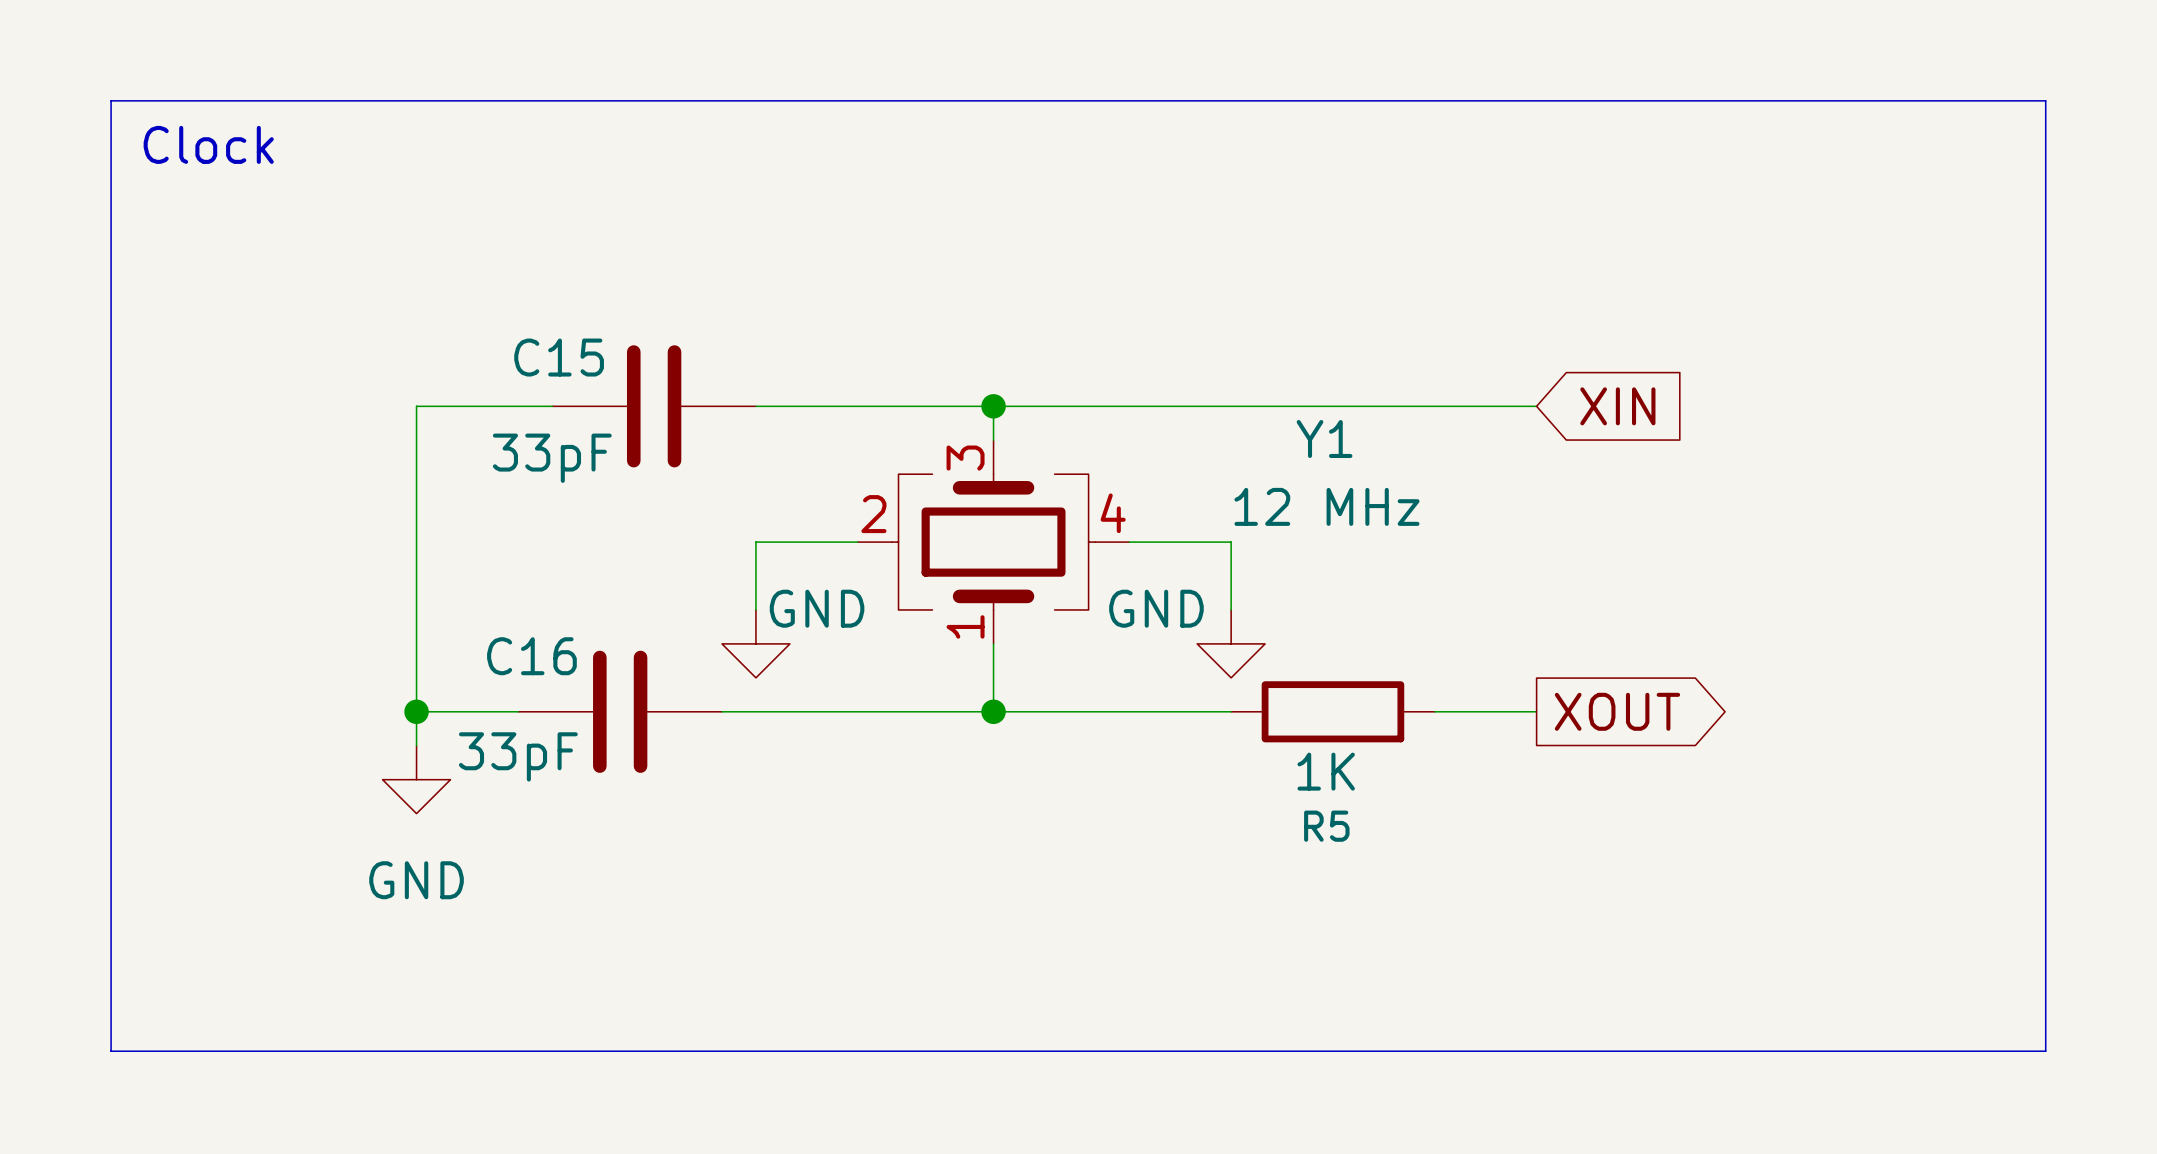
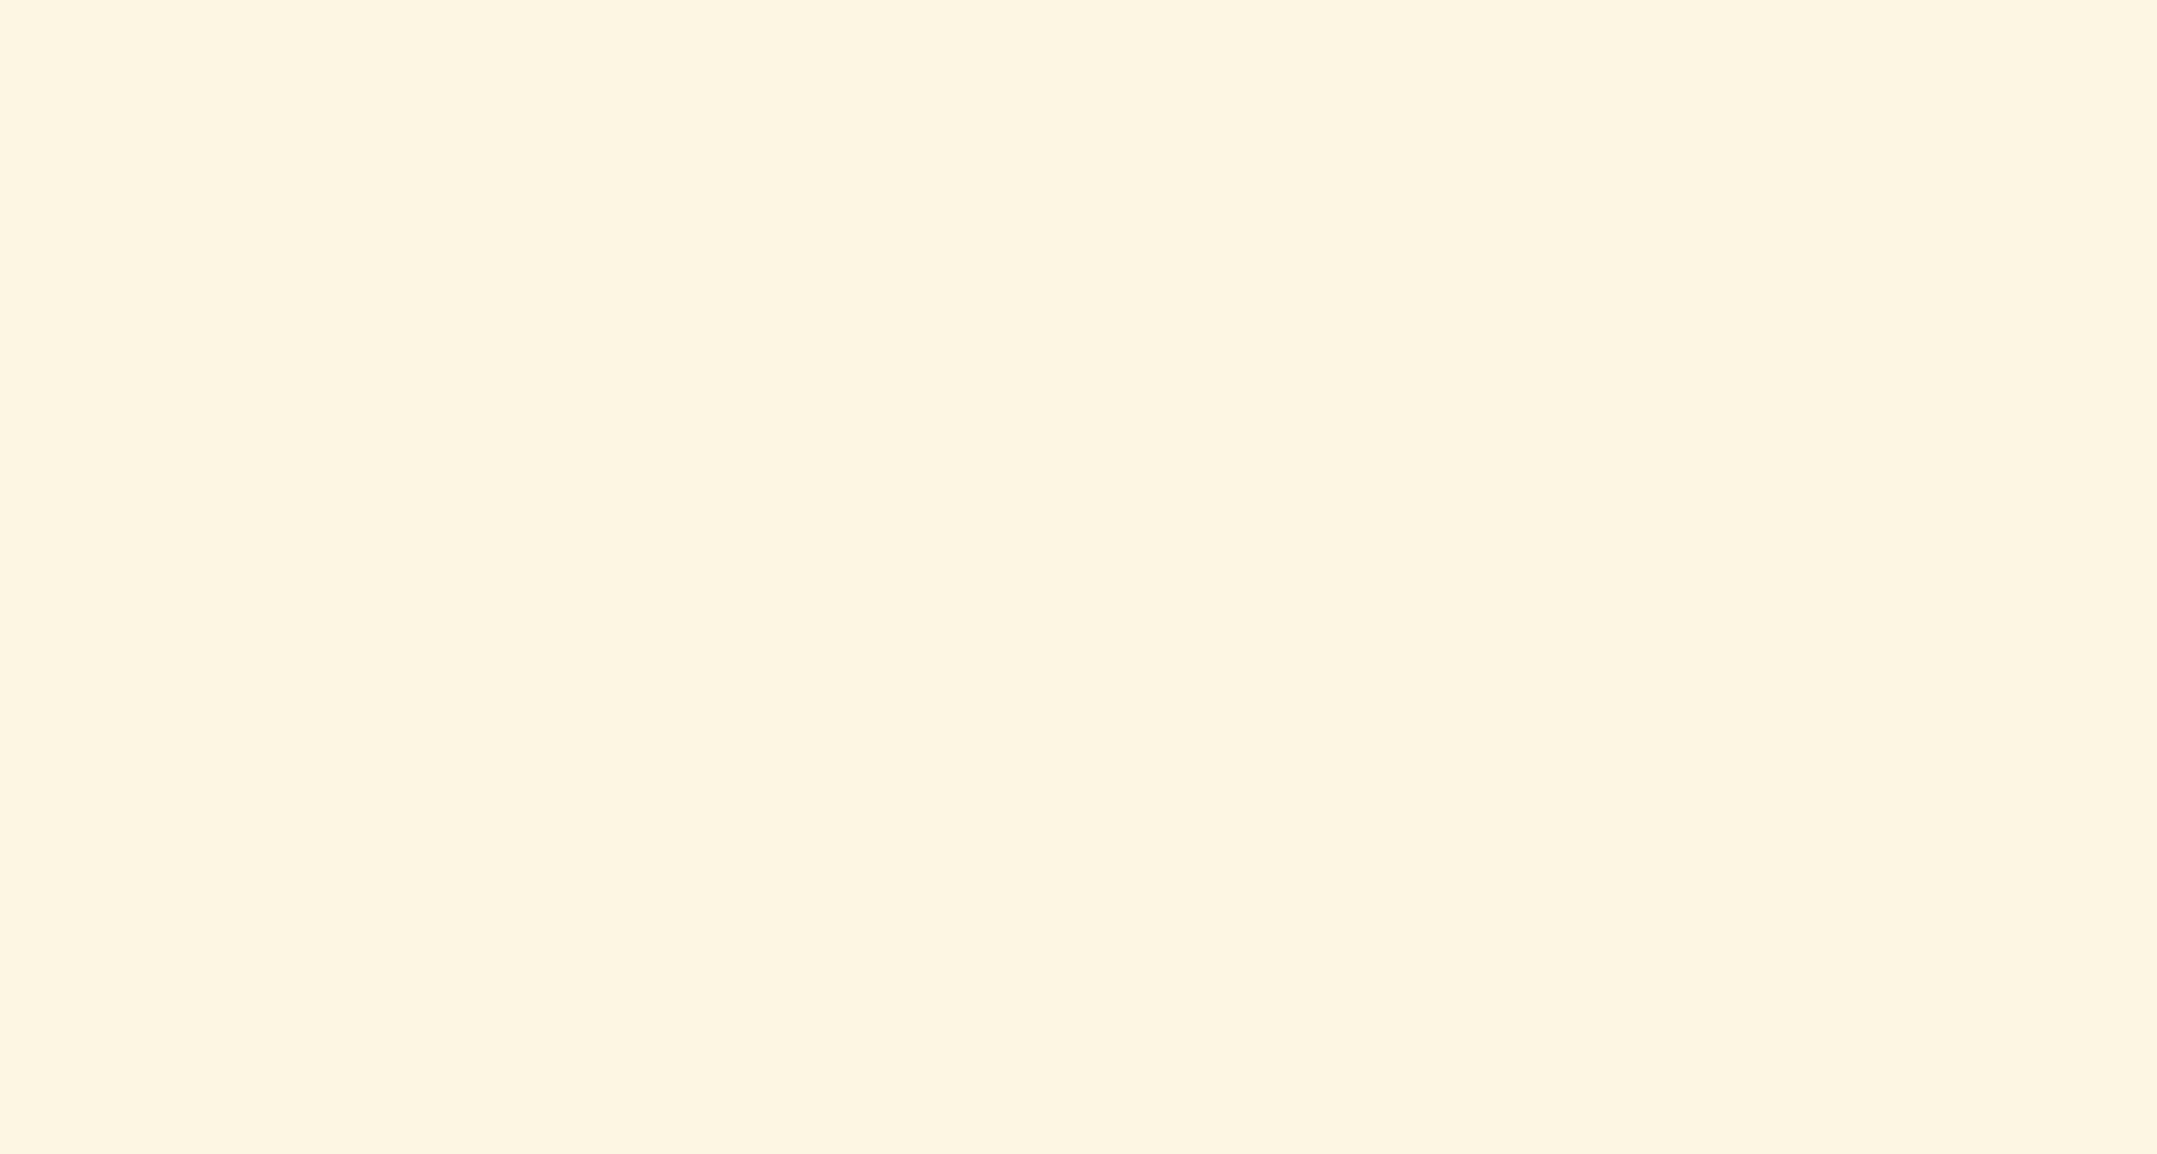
line: (111, 100) (111, 1051) (2045, 1051) (2045, 100) (111, 100) -> none
text: Clock (208, 144) -> none
wire: (552, 406) (416, 406) (416, 745) -> none
C15: 33pF (654, 406) -> none
wire: (755, 406) (1536, 406) -> none
wire: (993, 406) (993, 440) -> none
junction: (993, 406) -> none
global label: XIN (1617, 406) -> none
wire: (857, 542) (755, 542) (755, 609) -> none
Y1: 12 MHz (993, 542) -> none
wire: (1129, 542) (1231, 542) (1231, 609) -> none
power symbol: GND (755, 643) -> none
wire: (993, 643) (993, 711) -> none
power symbol: GND (1231, 643) -> none
wire: (416, 711) (518, 711) -> none
junction: (416, 711) -> none
C16: 33pF (620, 711) -> none
wire: (722, 711) (1231, 711) -> none
junction: (993, 711) -> none
R5: 1K (1332, 711) -> none
wire: (1434, 711) (1536, 711) -> none
global label: XOUT (1617, 711) -> none
power symbol: GND (416, 779) -> none

